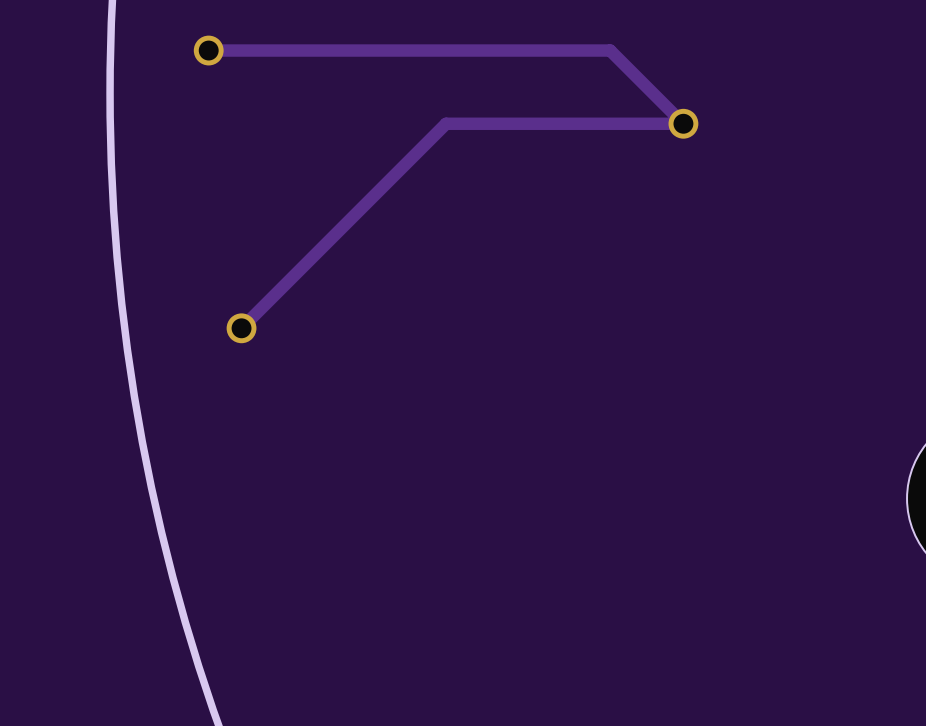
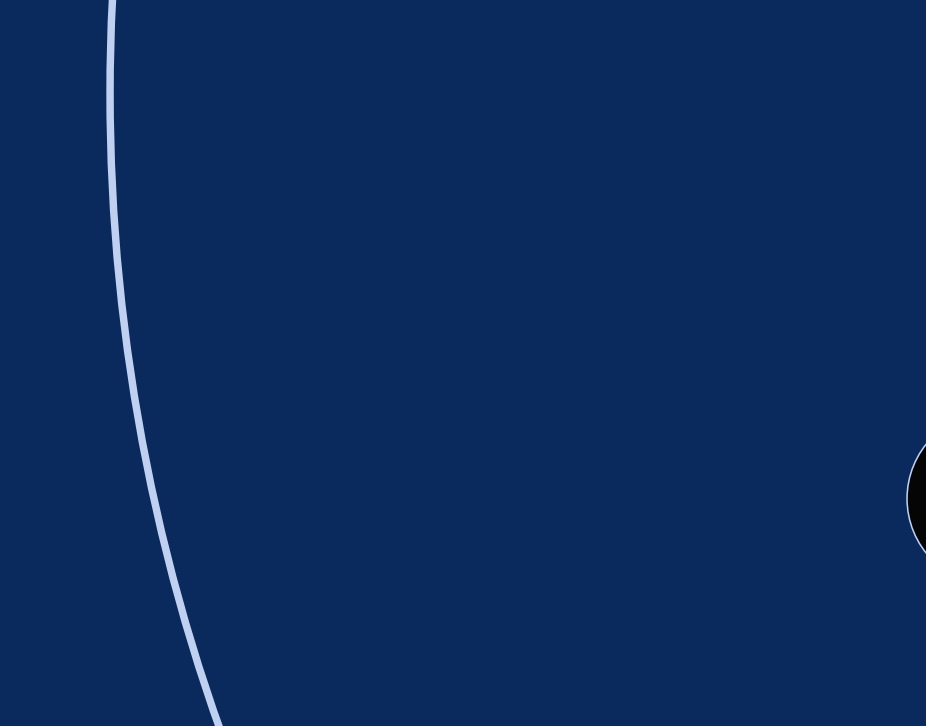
track: (208, 50) (610, 50) (683, 123) (446, 123) (241, 328) -> none
via: (208, 50) -> none
via: (683, 123) -> none
via: (241, 328) -> none

